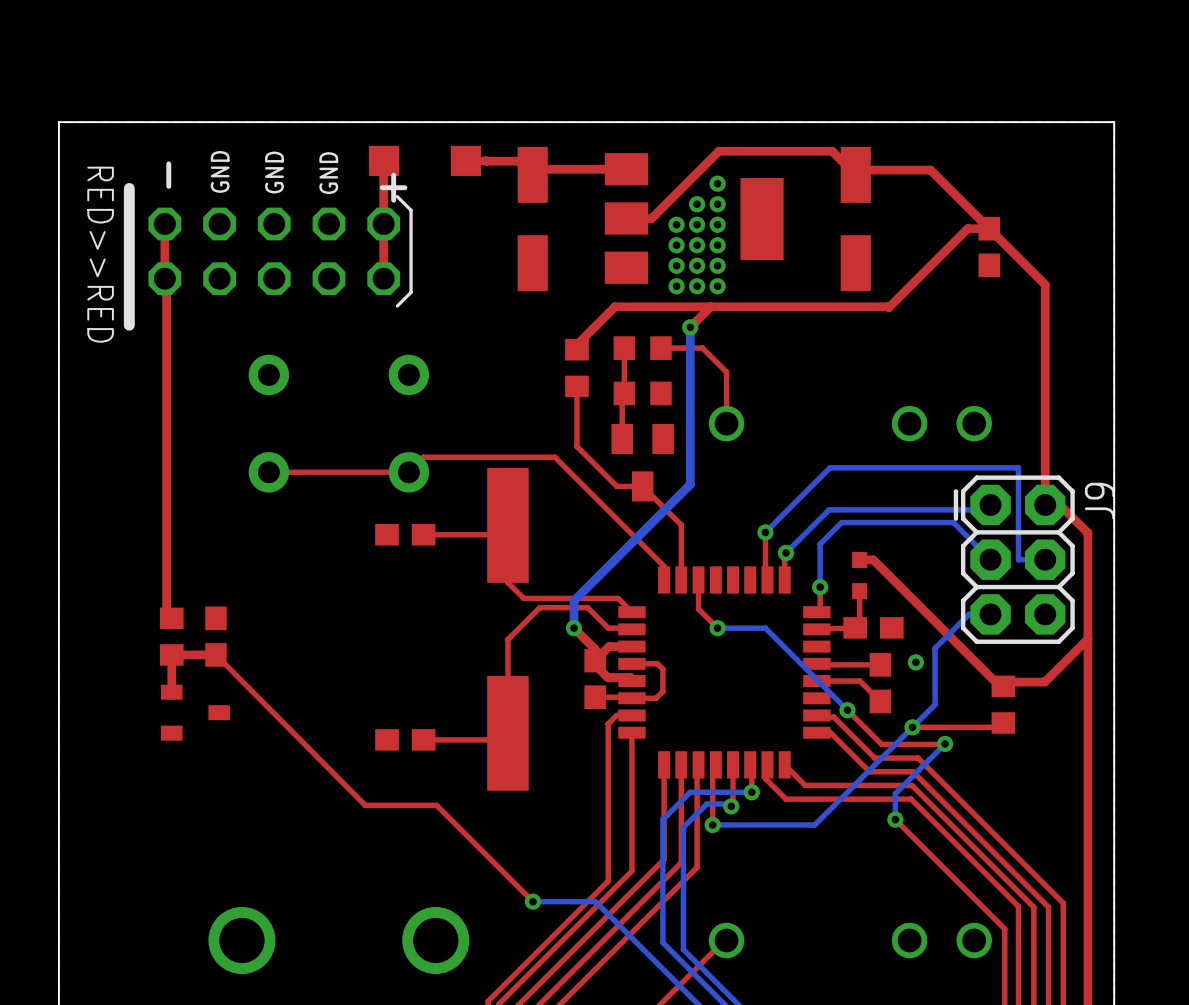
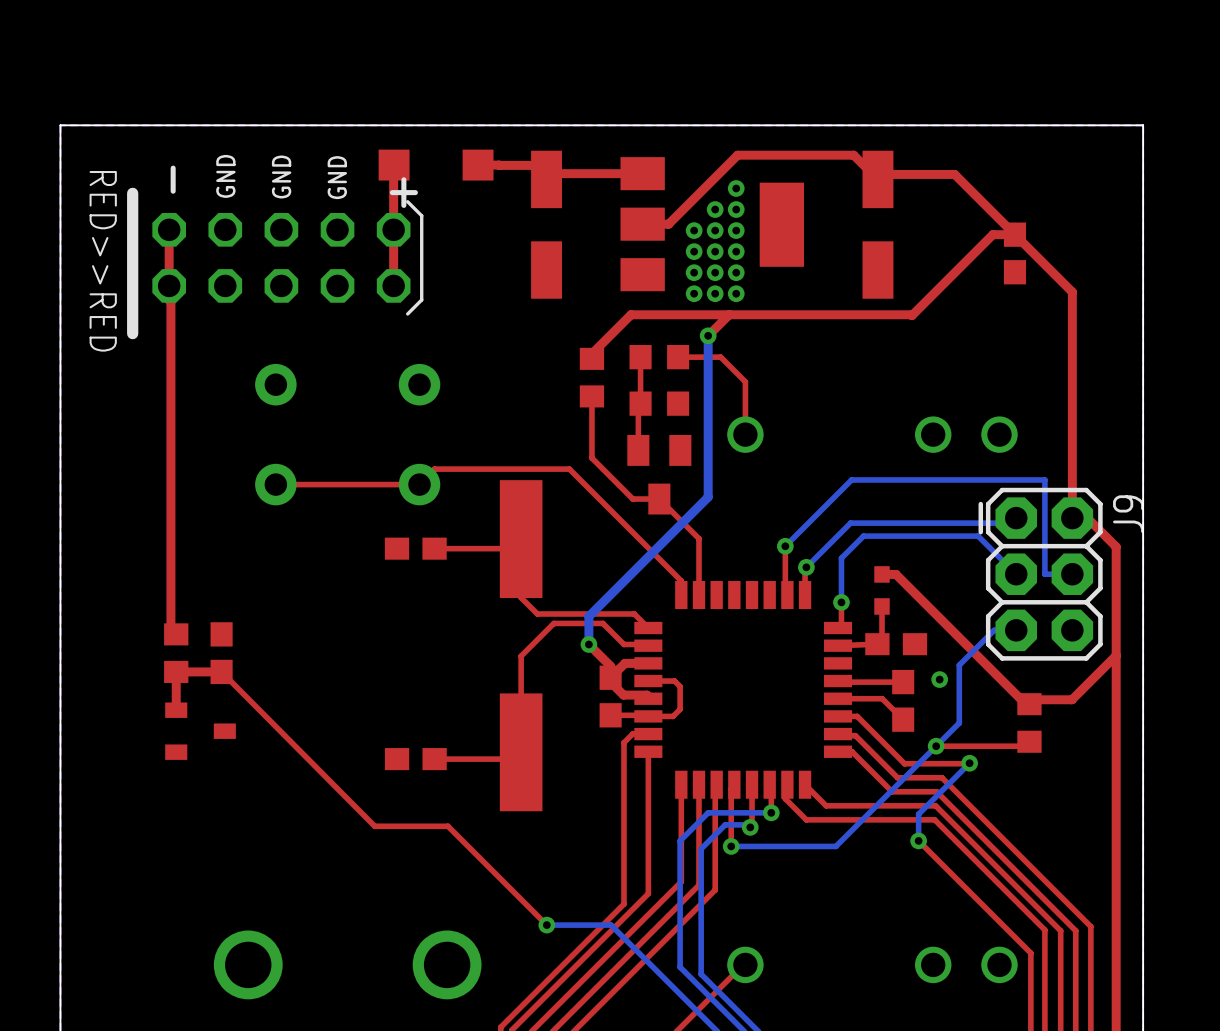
top track: (698, 579) (698, 609) (717, 628) -> none
bottom track: (717, 628) (765, 628) (847, 710) -> none
via: (717, 628) -> none
top track: none -> (838, 716) (857, 716) (869, 728)
via: (847, 710) -> none

